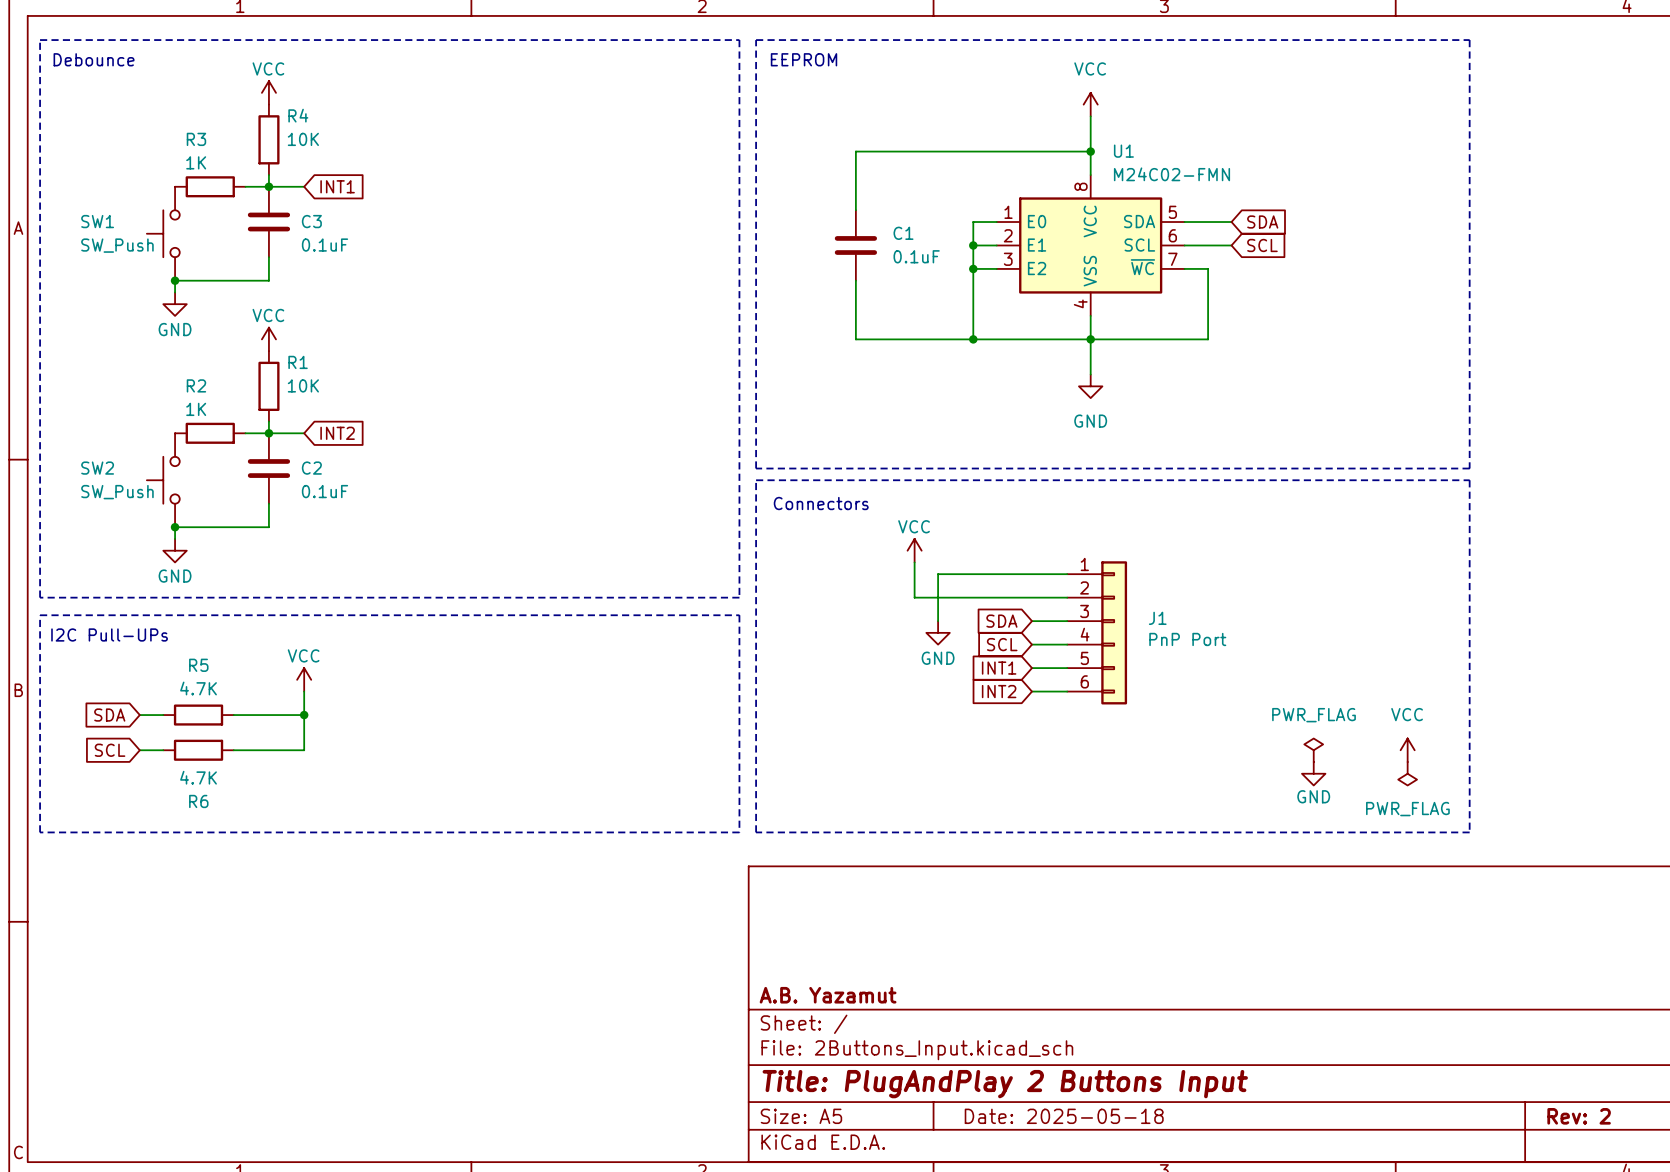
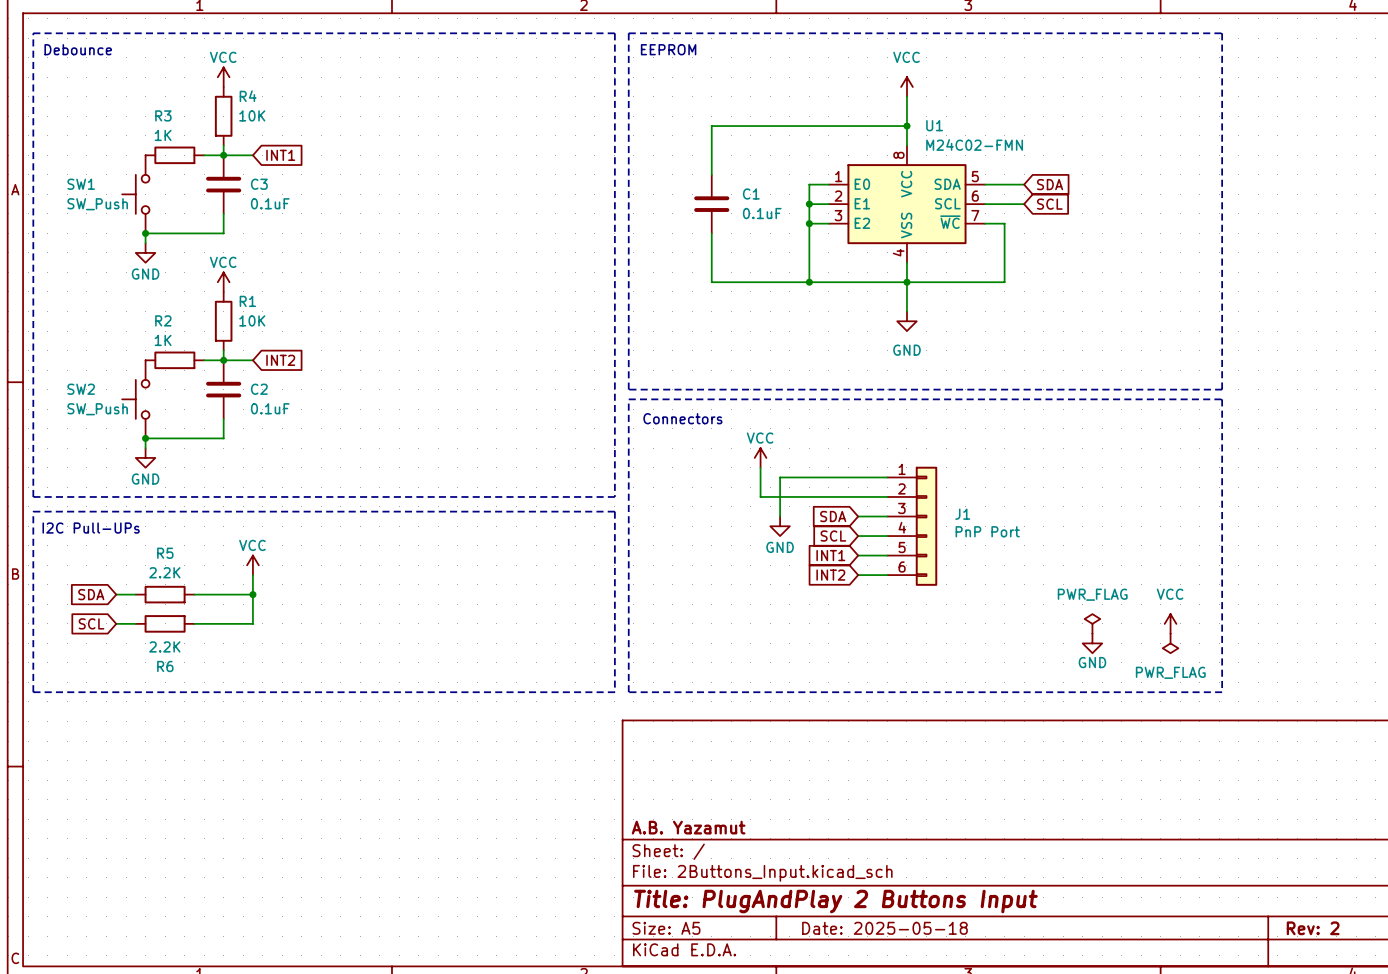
R5 value: 4.7K (198, 688) -> 2.2K (164, 572)
R6 value: 4.7K (198, 777) -> 2.2K (164, 646)

